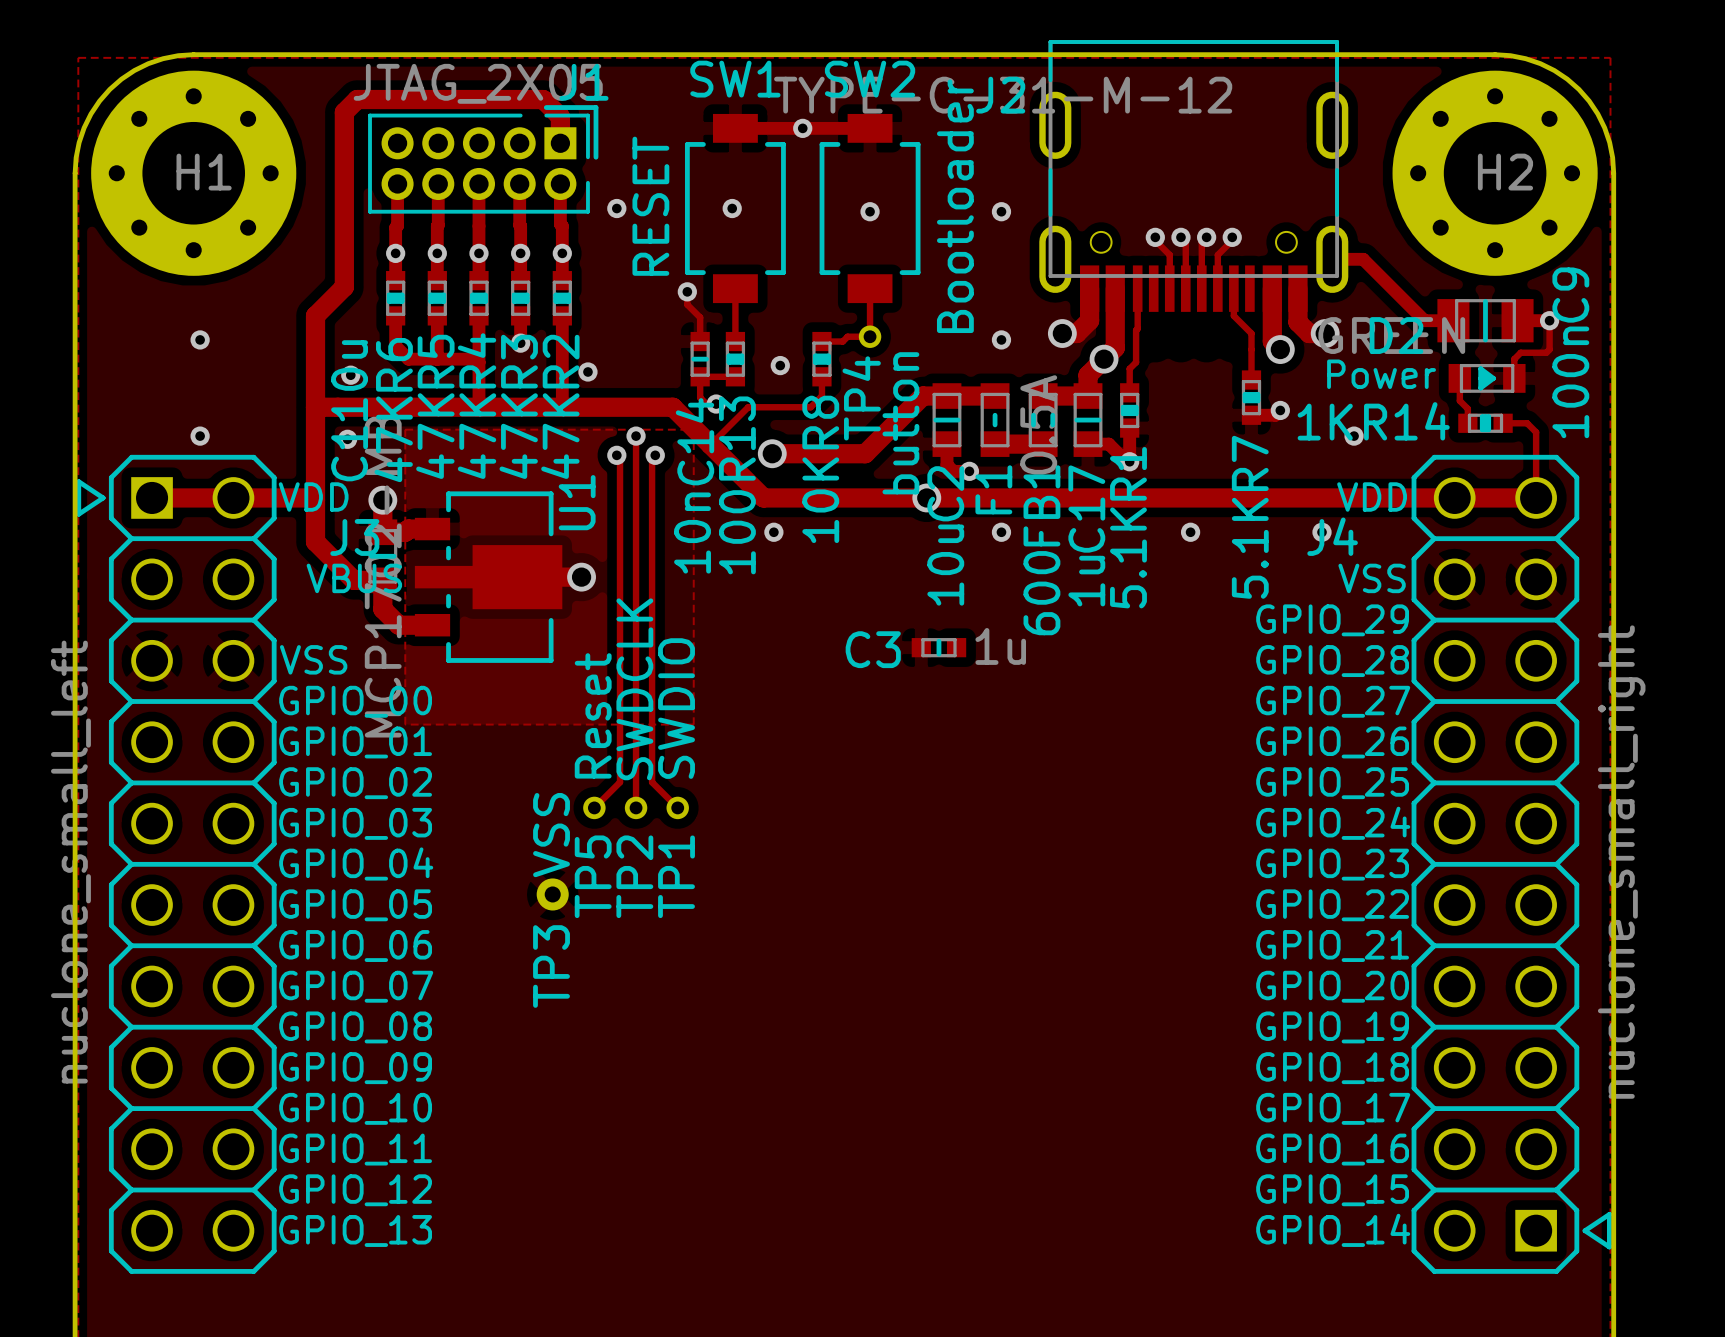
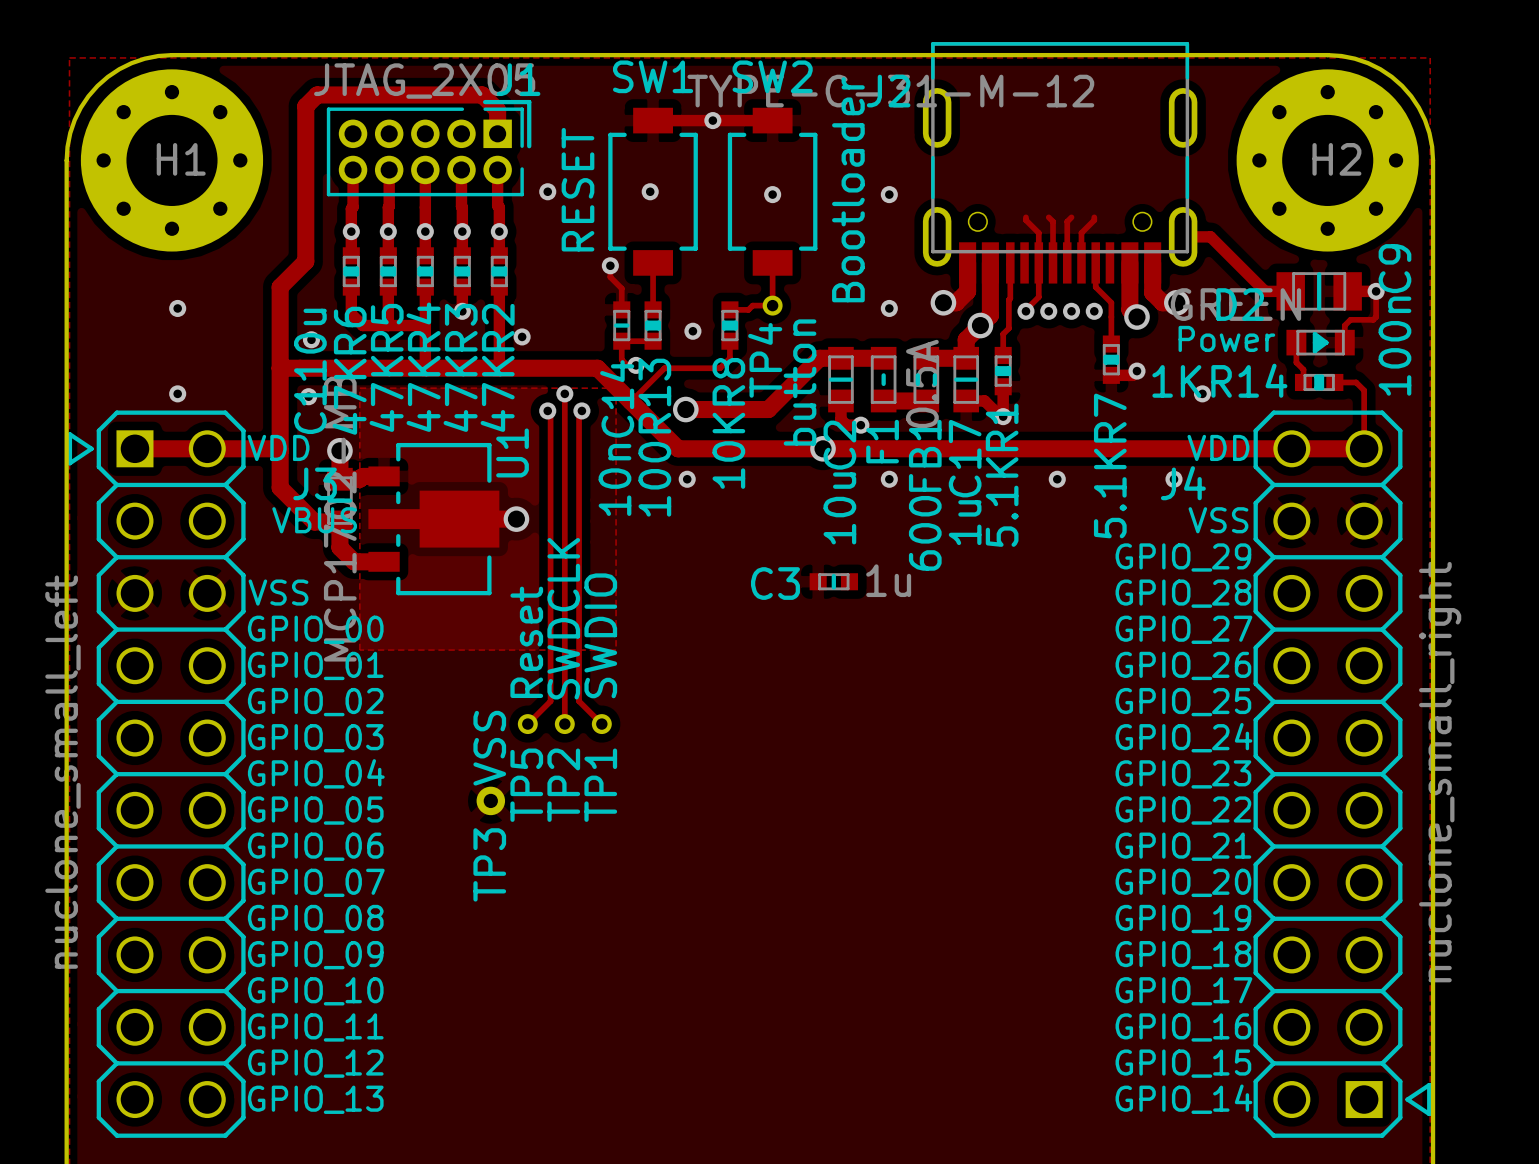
via: (1155, 237) -> none
via: (1180, 237) -> none
via: (1206, 237) -> none
via: (1232, 237) -> none
track: none -> (1038, 275) (1038, 297) (1025, 311)
via: none -> (1025, 311)
via: none -> (1048, 311)
via: none -> (1071, 311)
via: none -> (1094, 311)

